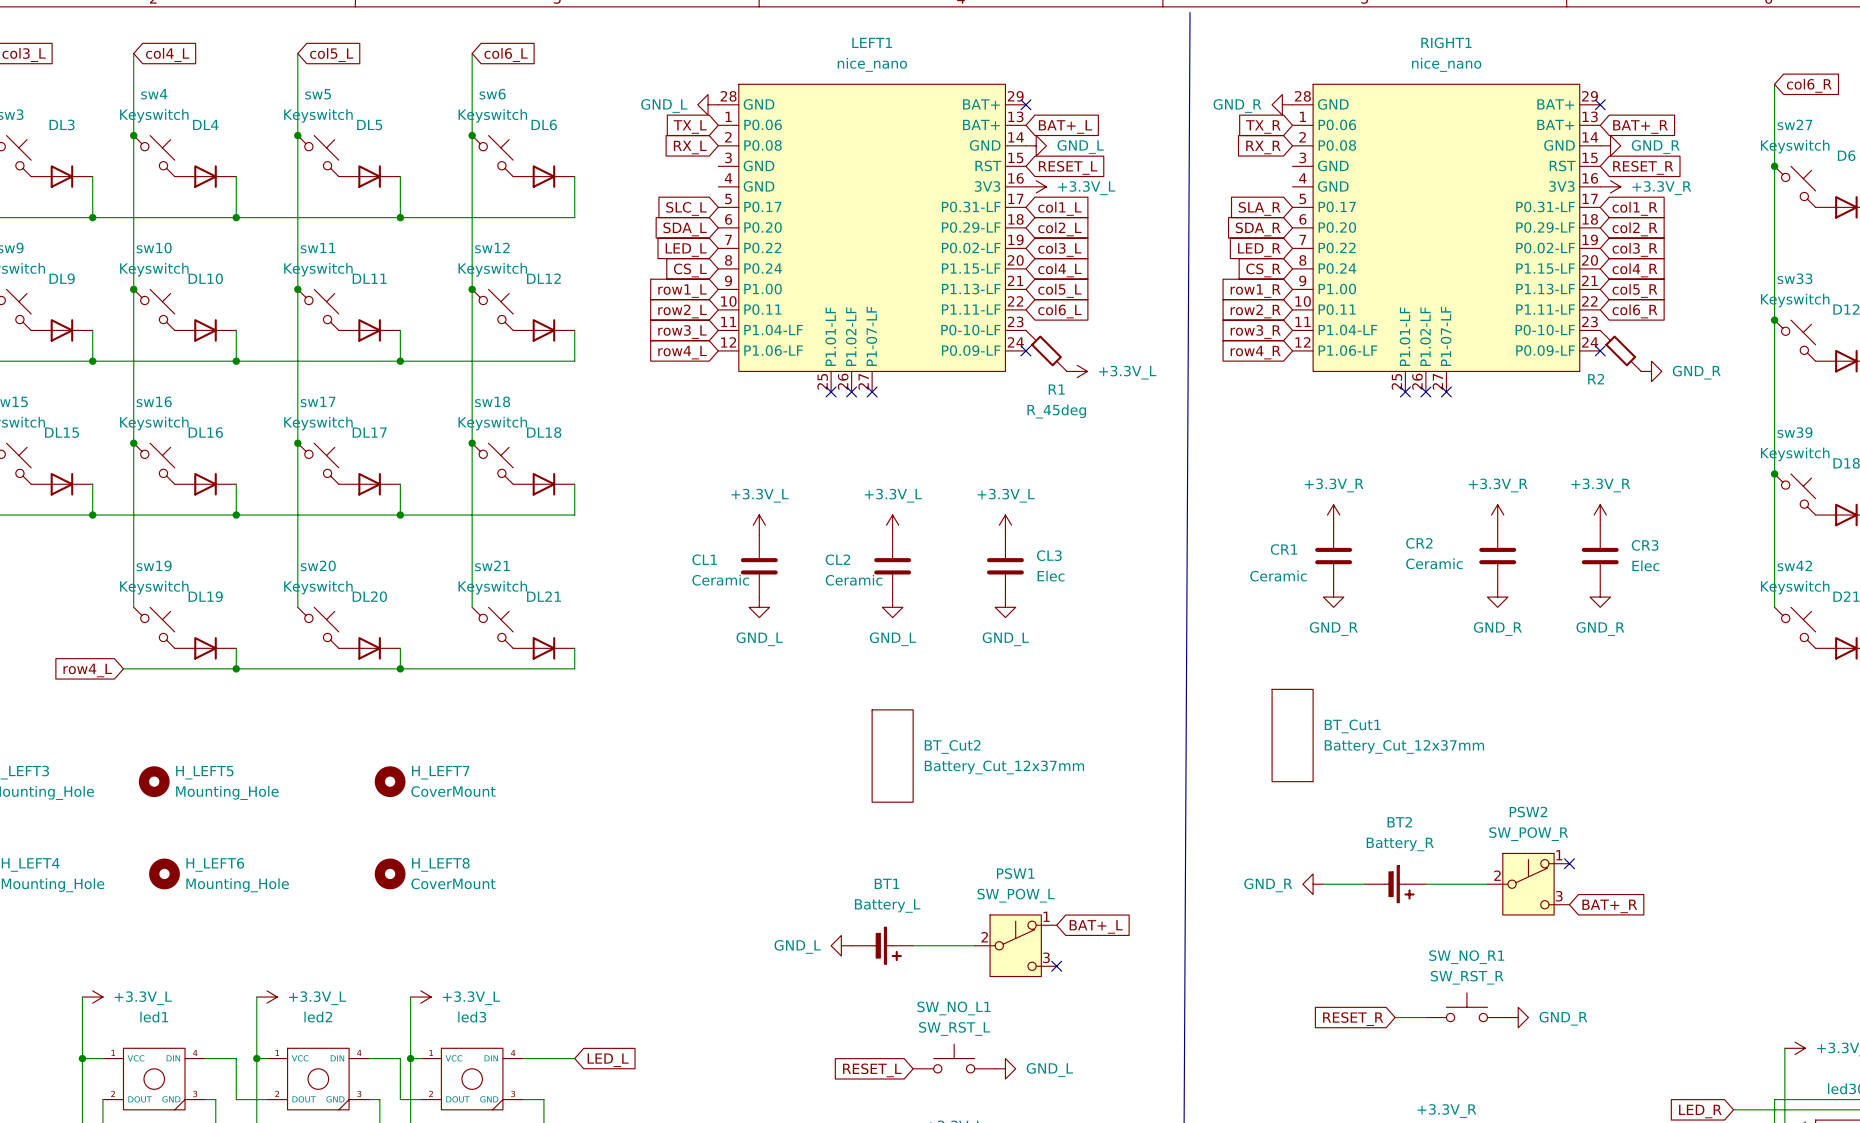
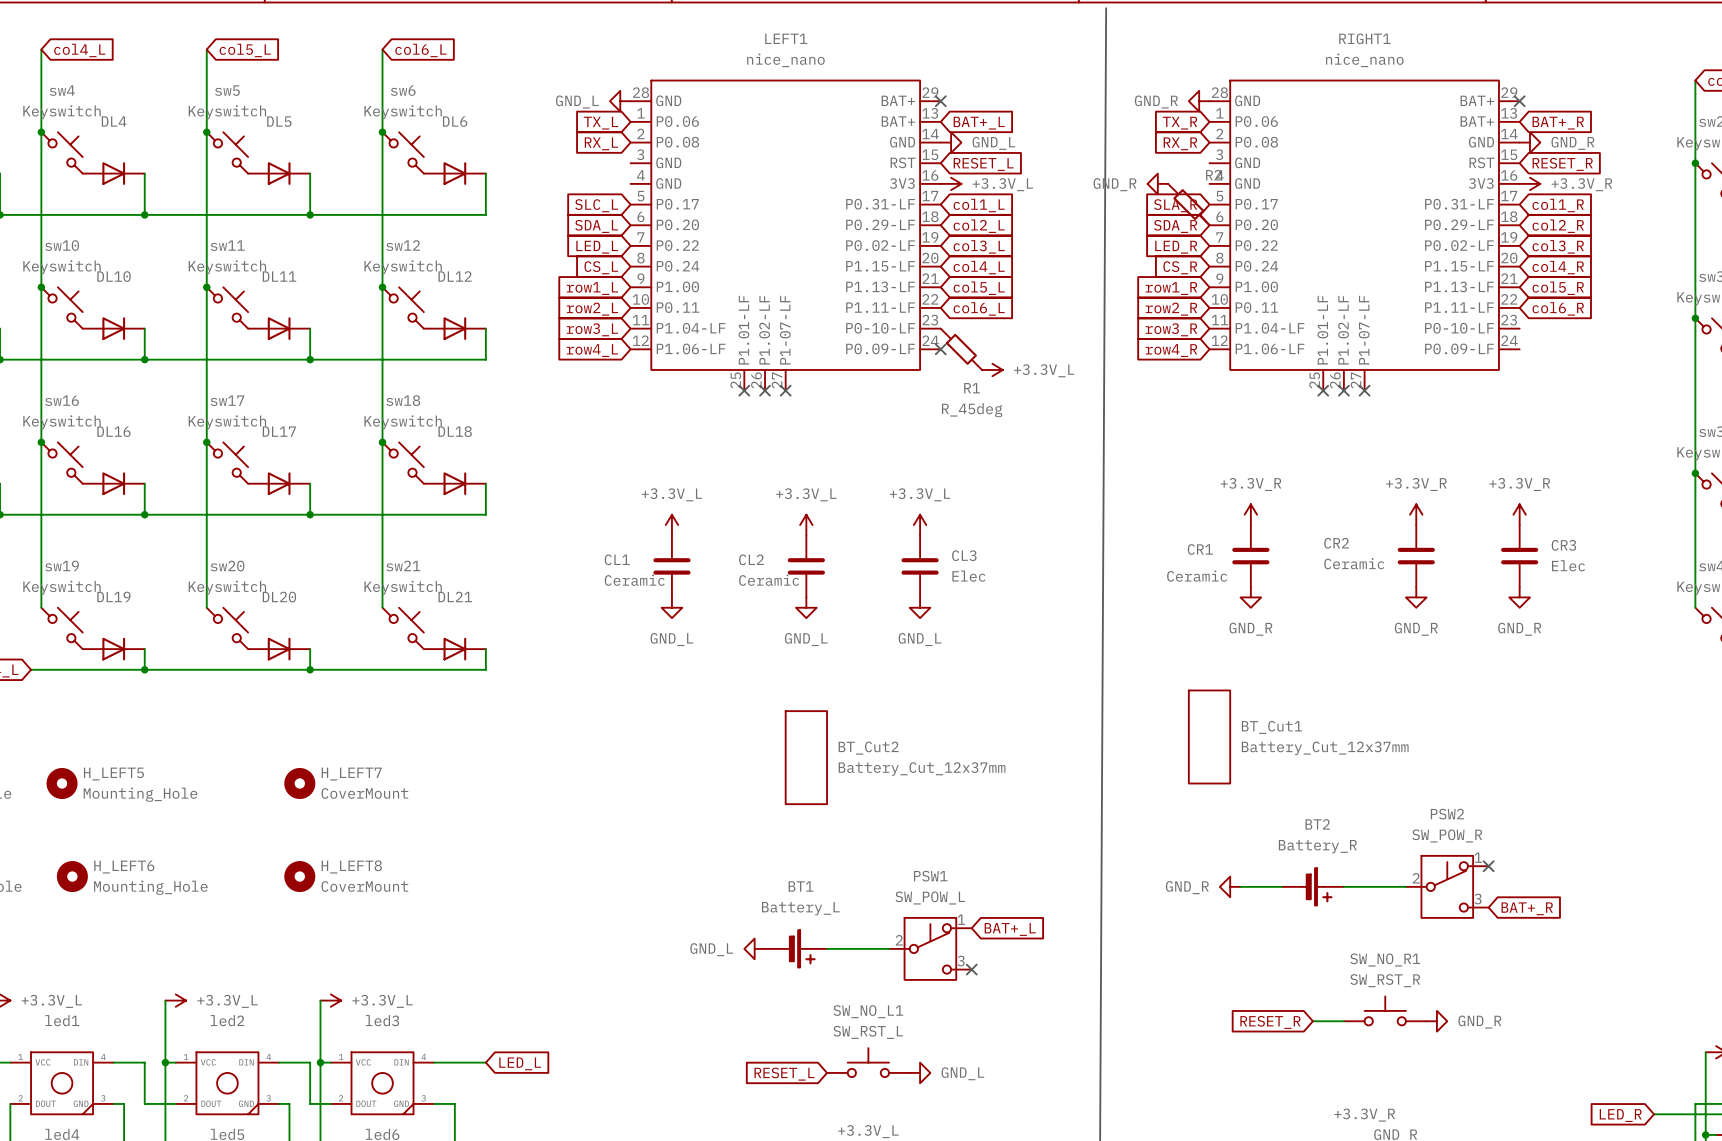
power symbol: none -> GND_R (1157, 183)
no-connect mark: (1600, 350) -> none
R2 position: (1620, 350) -> (1188, 204)
power symbol: GND_R (1651, 371) -> none
R2 name position: R2 (1596, 379) -> R2 (1213, 175)

